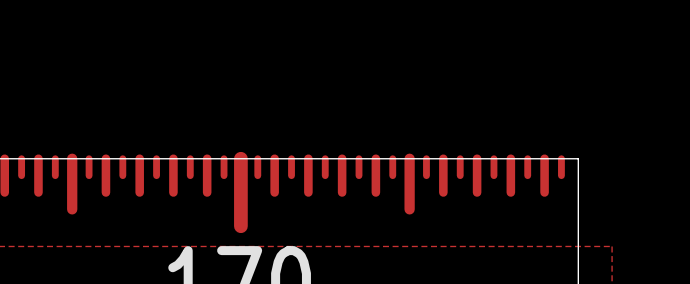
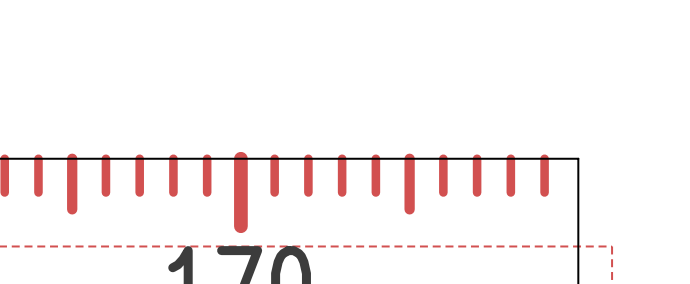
top track: (21, 158) (21, 175) -> none
top track: (55, 158) (55, 175) -> none
top track: (89, 158) (89, 175) -> none
top track: (122, 158) (122, 175) -> none
top track: (156, 158) (156, 175) -> none
top track: (190, 158) (190, 175) -> none
top track: (224, 158) (224, 175) -> none
top track: (257, 158) (257, 175) -> none
top track: (291, 158) (291, 175) -> none
top track: (325, 158) (325, 175) -> none
top track: (359, 158) (359, 175) -> none
top track: (392, 158) (392, 175) -> none
top track: (426, 158) (426, 175) -> none
top track: (460, 158) (460, 175) -> none
top track: (493, 158) (493, 175) -> none
top track: (527, 158) (527, 175) -> none
top track: (561, 158) (561, 175) -> none

